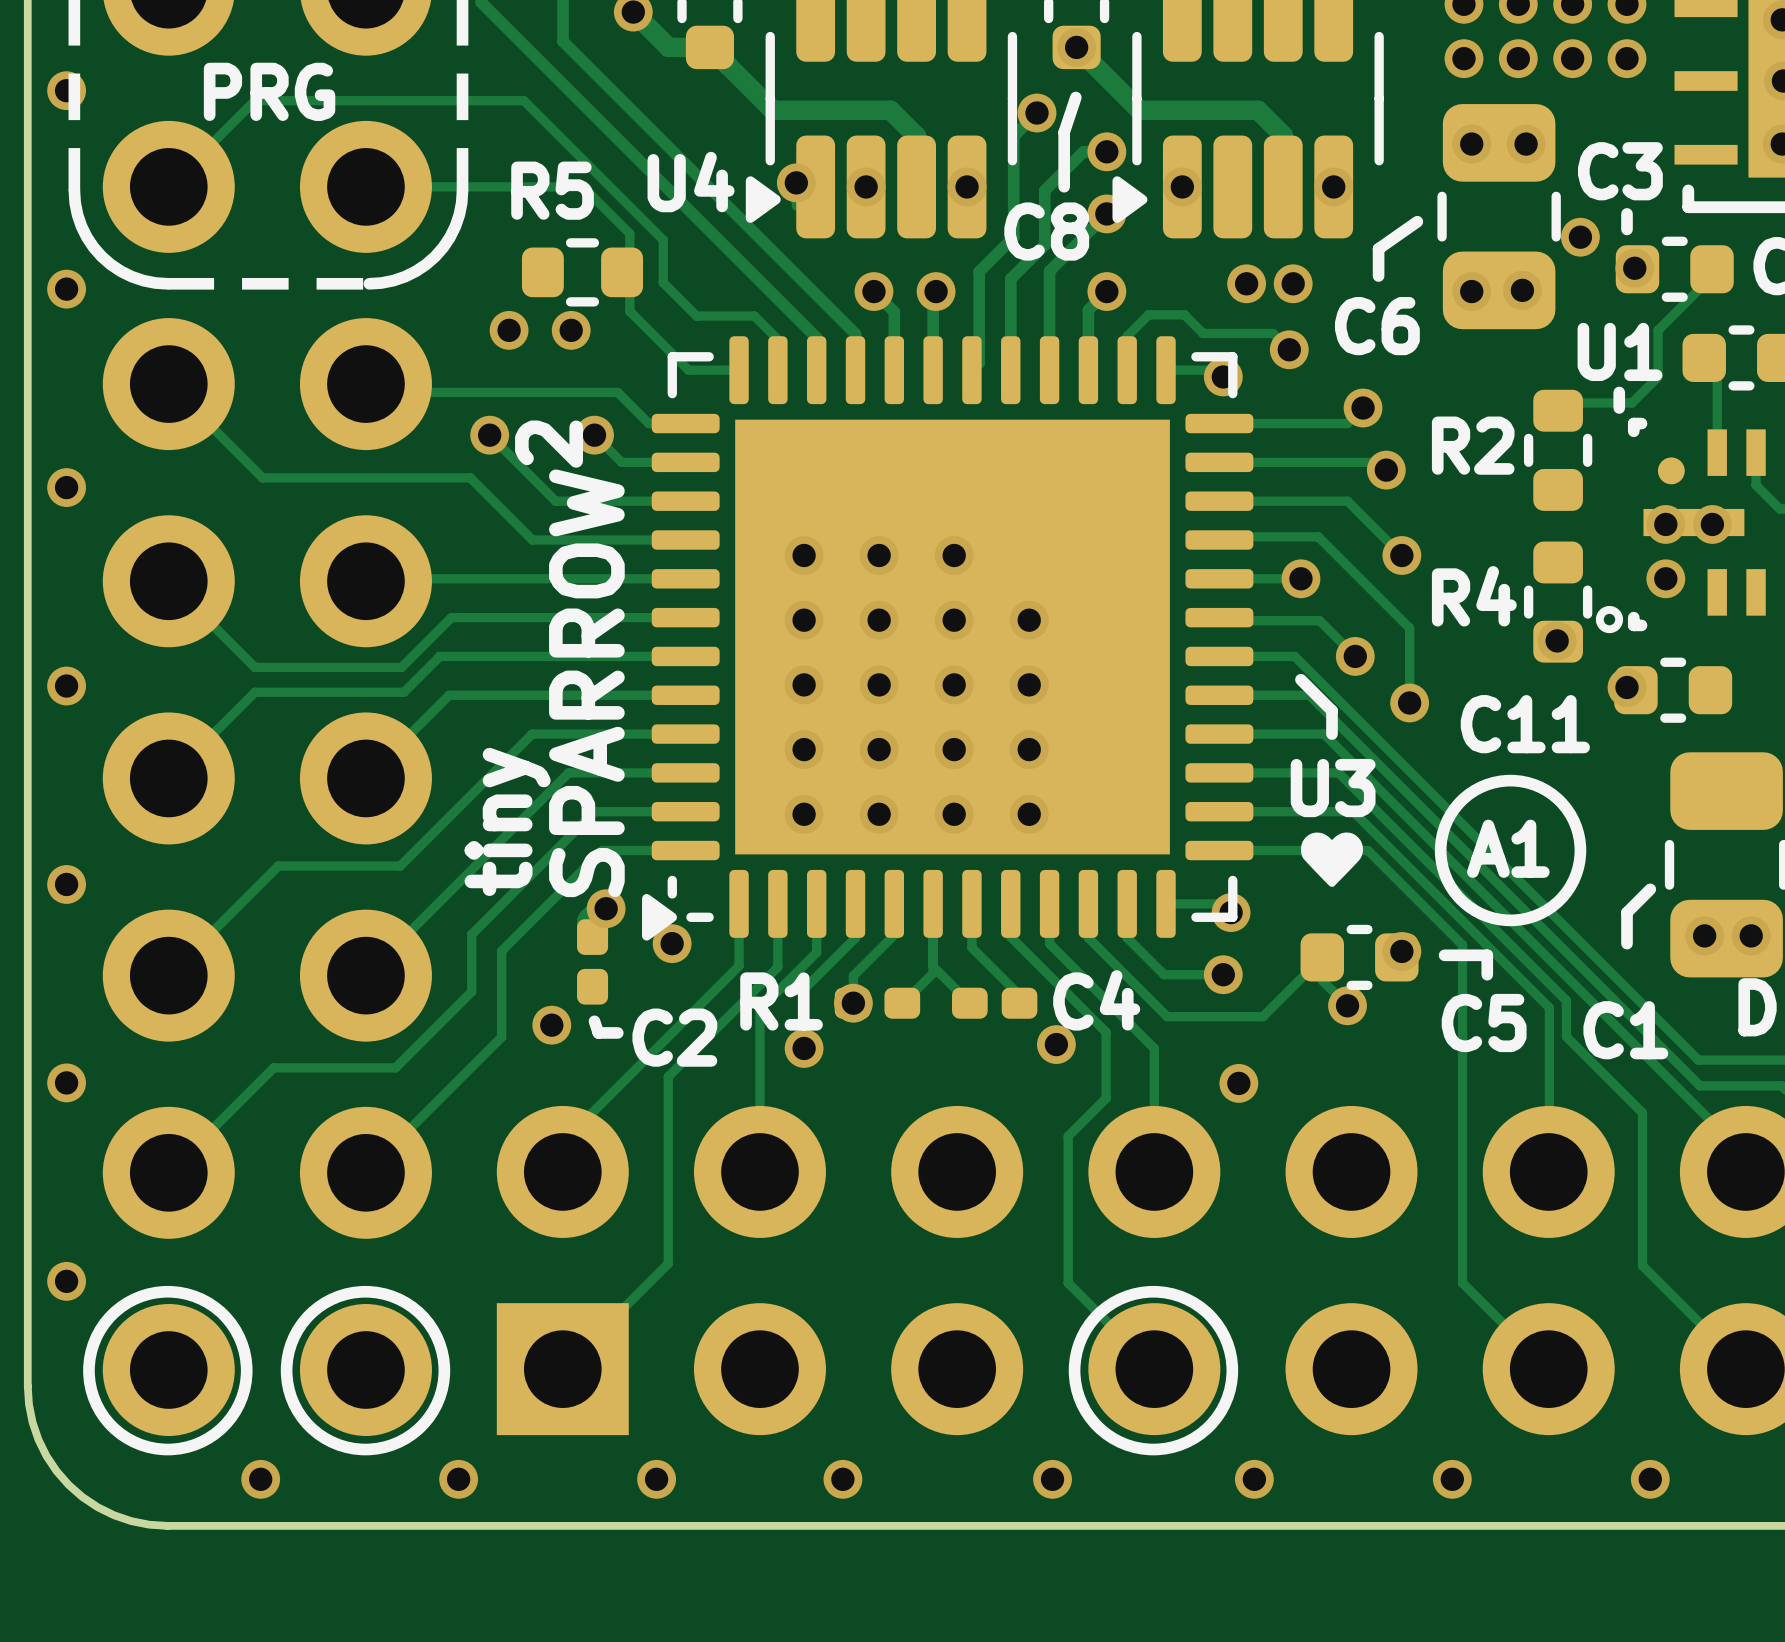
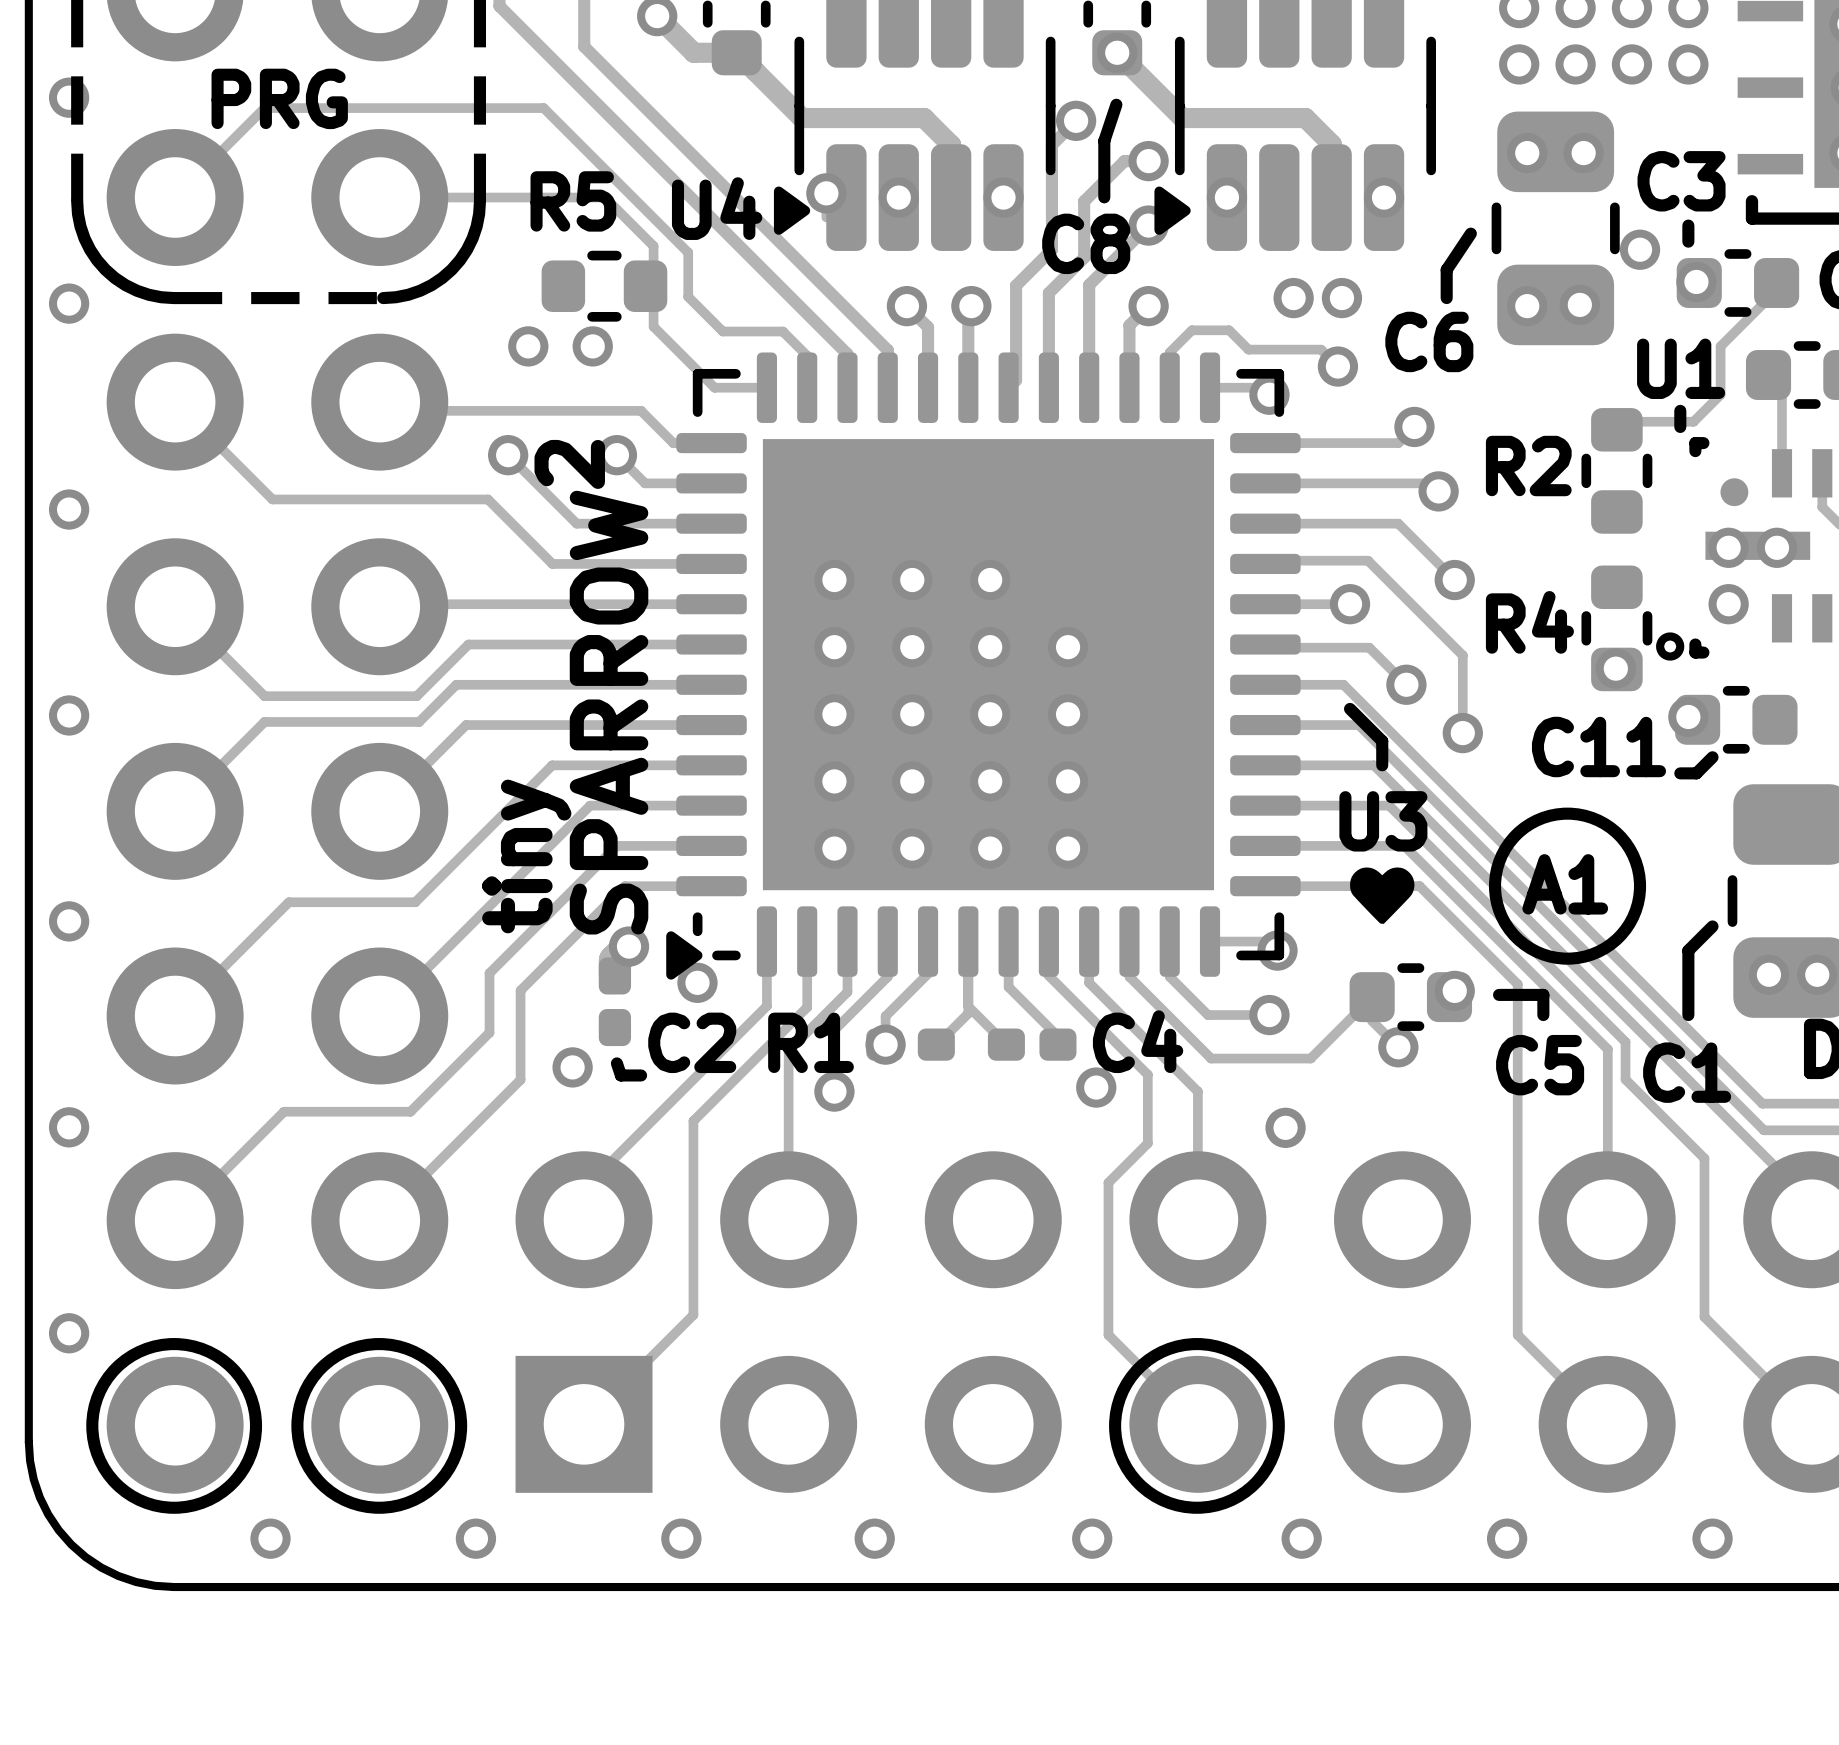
U4 name position: U4 (691, 182) -> U4 (717, 208)
line: (1417, 221) (1378, 248) (1378, 276) -> (1470, 233) (1446, 269) (1446, 298)
C11 name position: C11 (1525, 724) -> C11 (1598, 746)
line: none -> (1712, 757) (1696, 773) (1680, 773)
line: none -> (1688, 982) (1688, 1015)
C2 name position: C2 (674, 1037) -> C2 (692, 1042)

